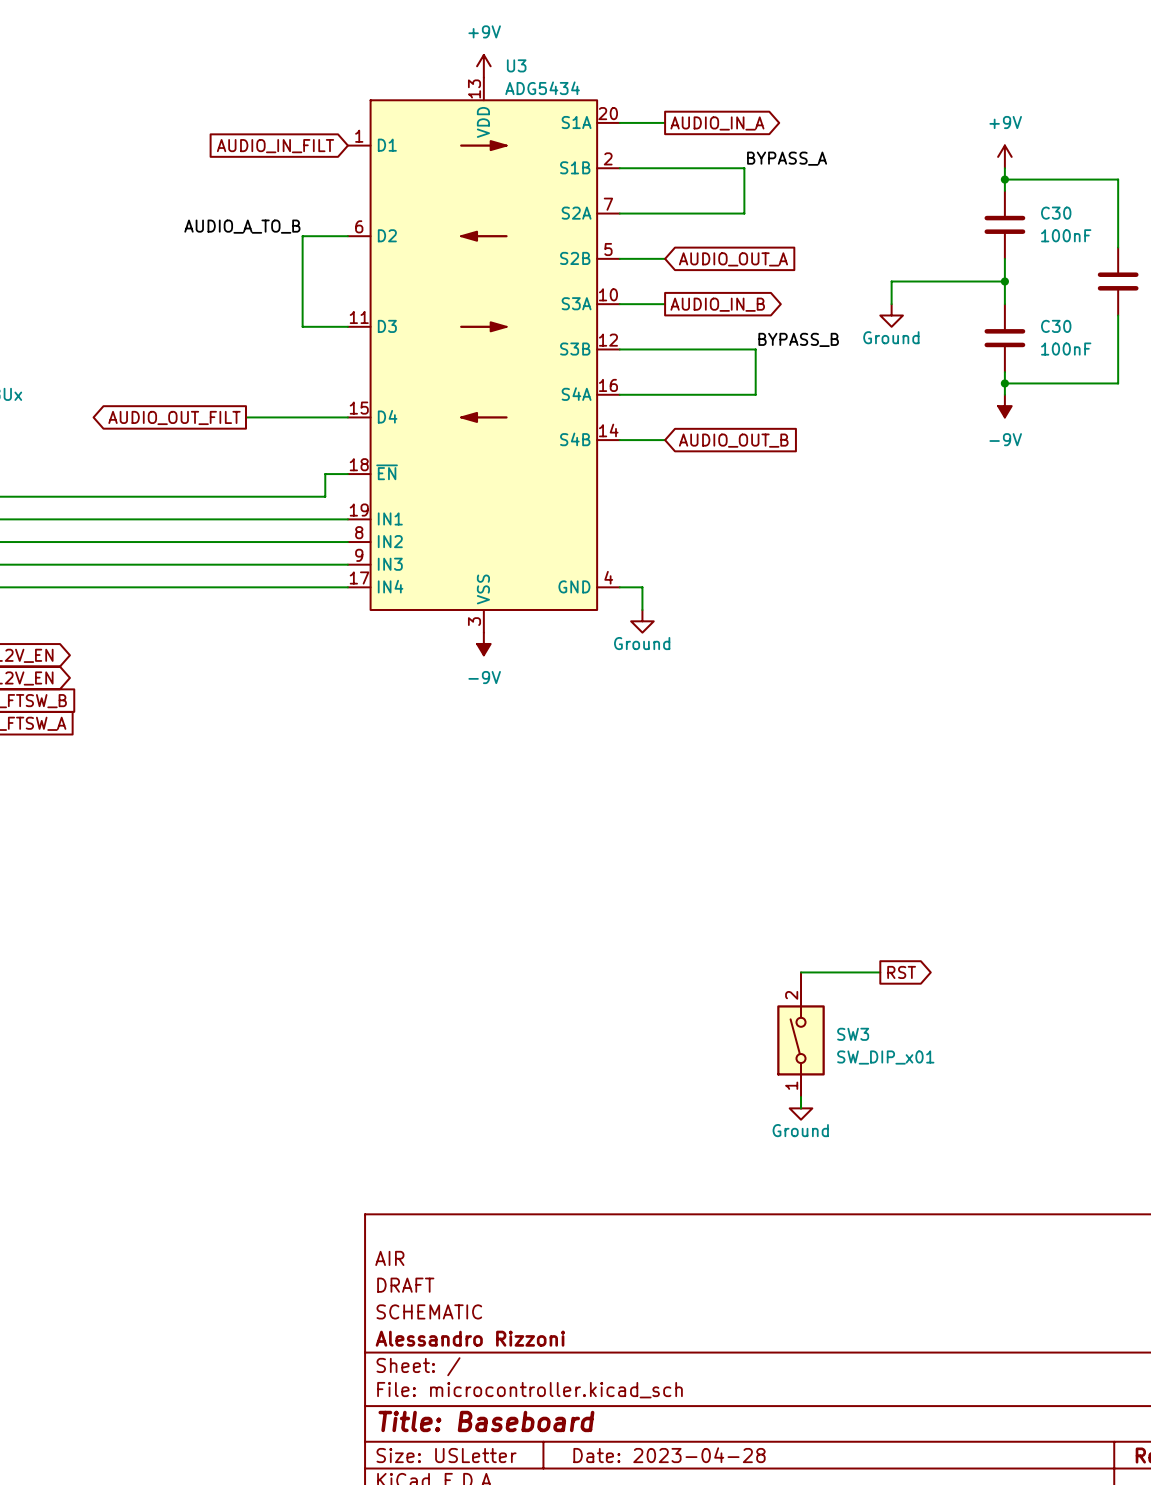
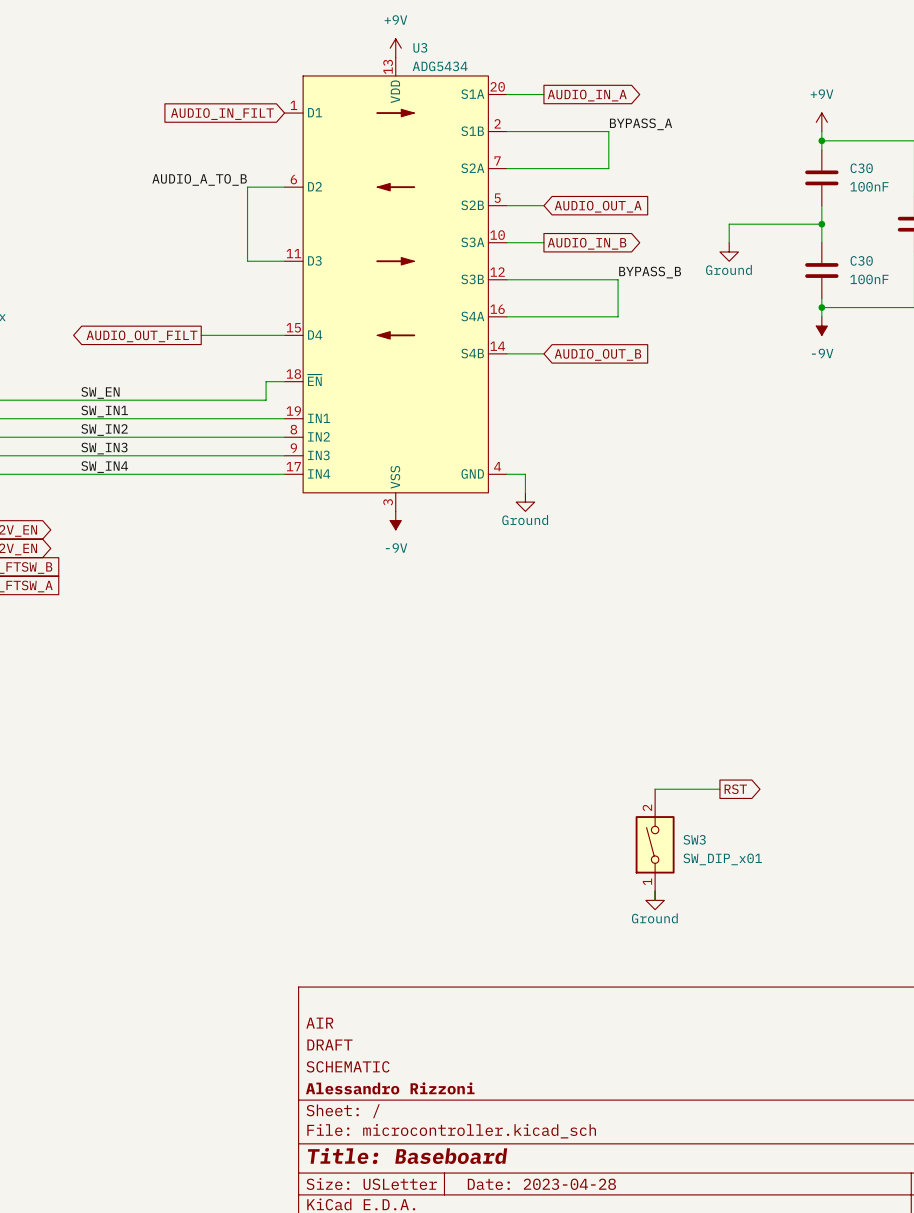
label: none -> SW_EN (100, 392)
label: none -> SW_IN1 (104, 411)
label: none -> SW_IN2 (104, 430)
label: none -> SW_IN3 (104, 448)
label: none -> SW_IN4 (104, 467)

